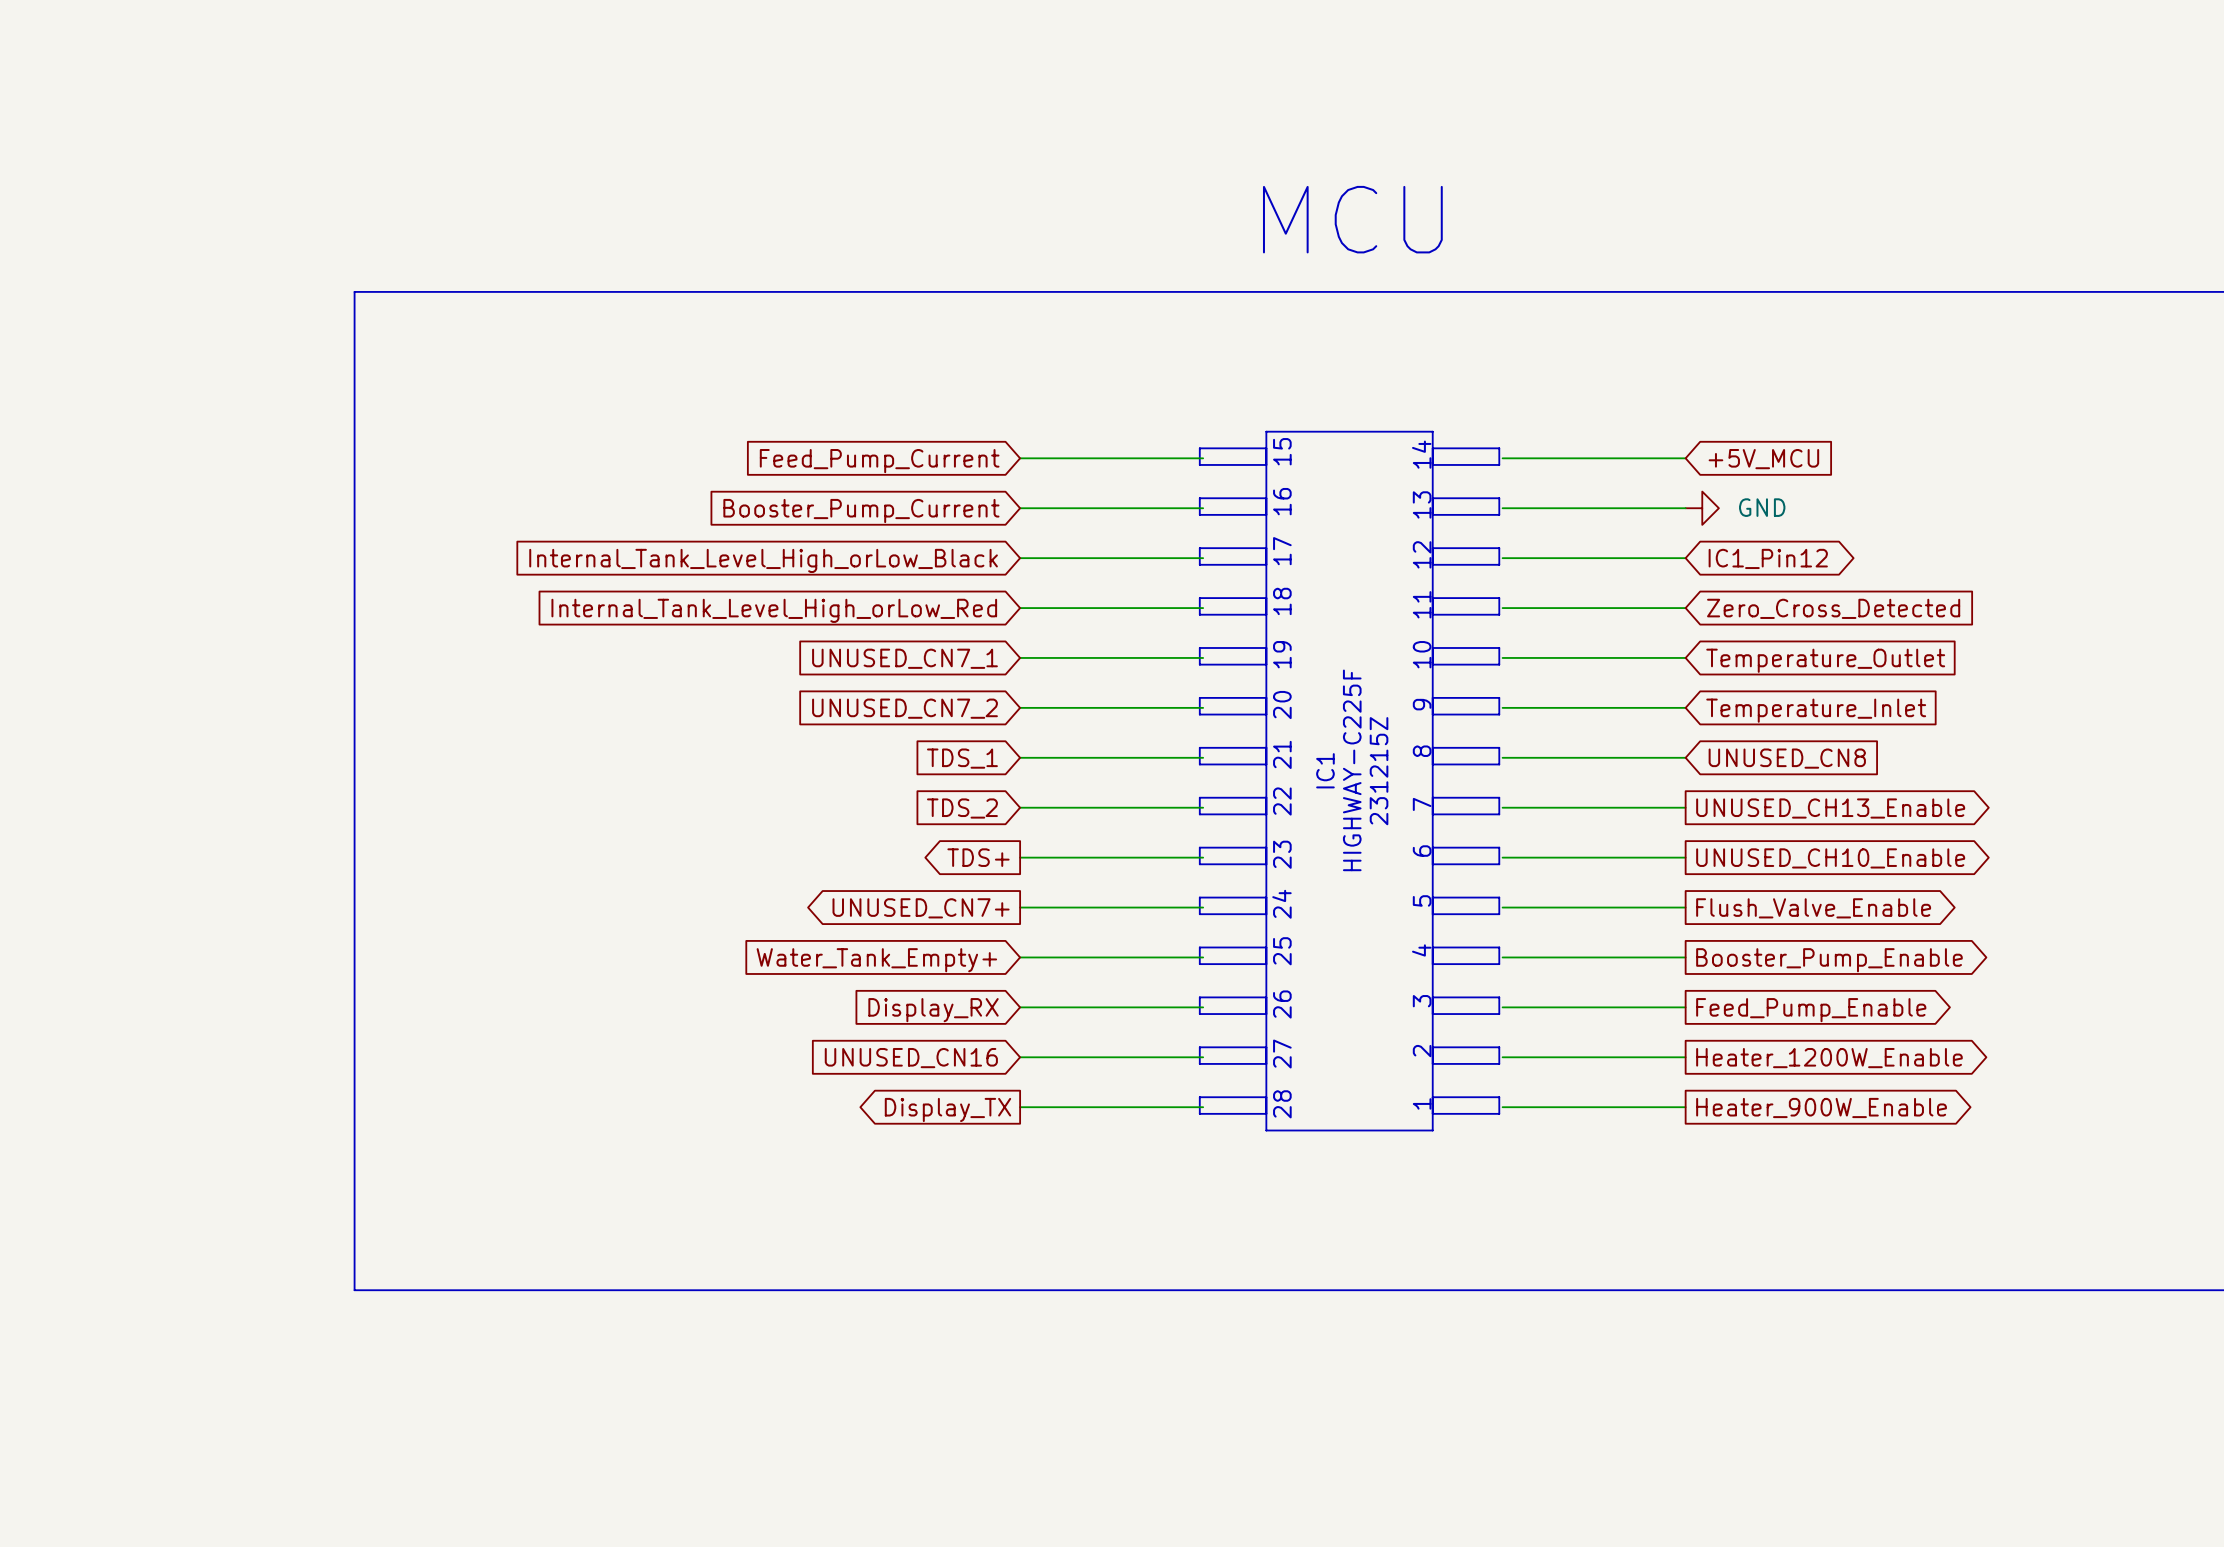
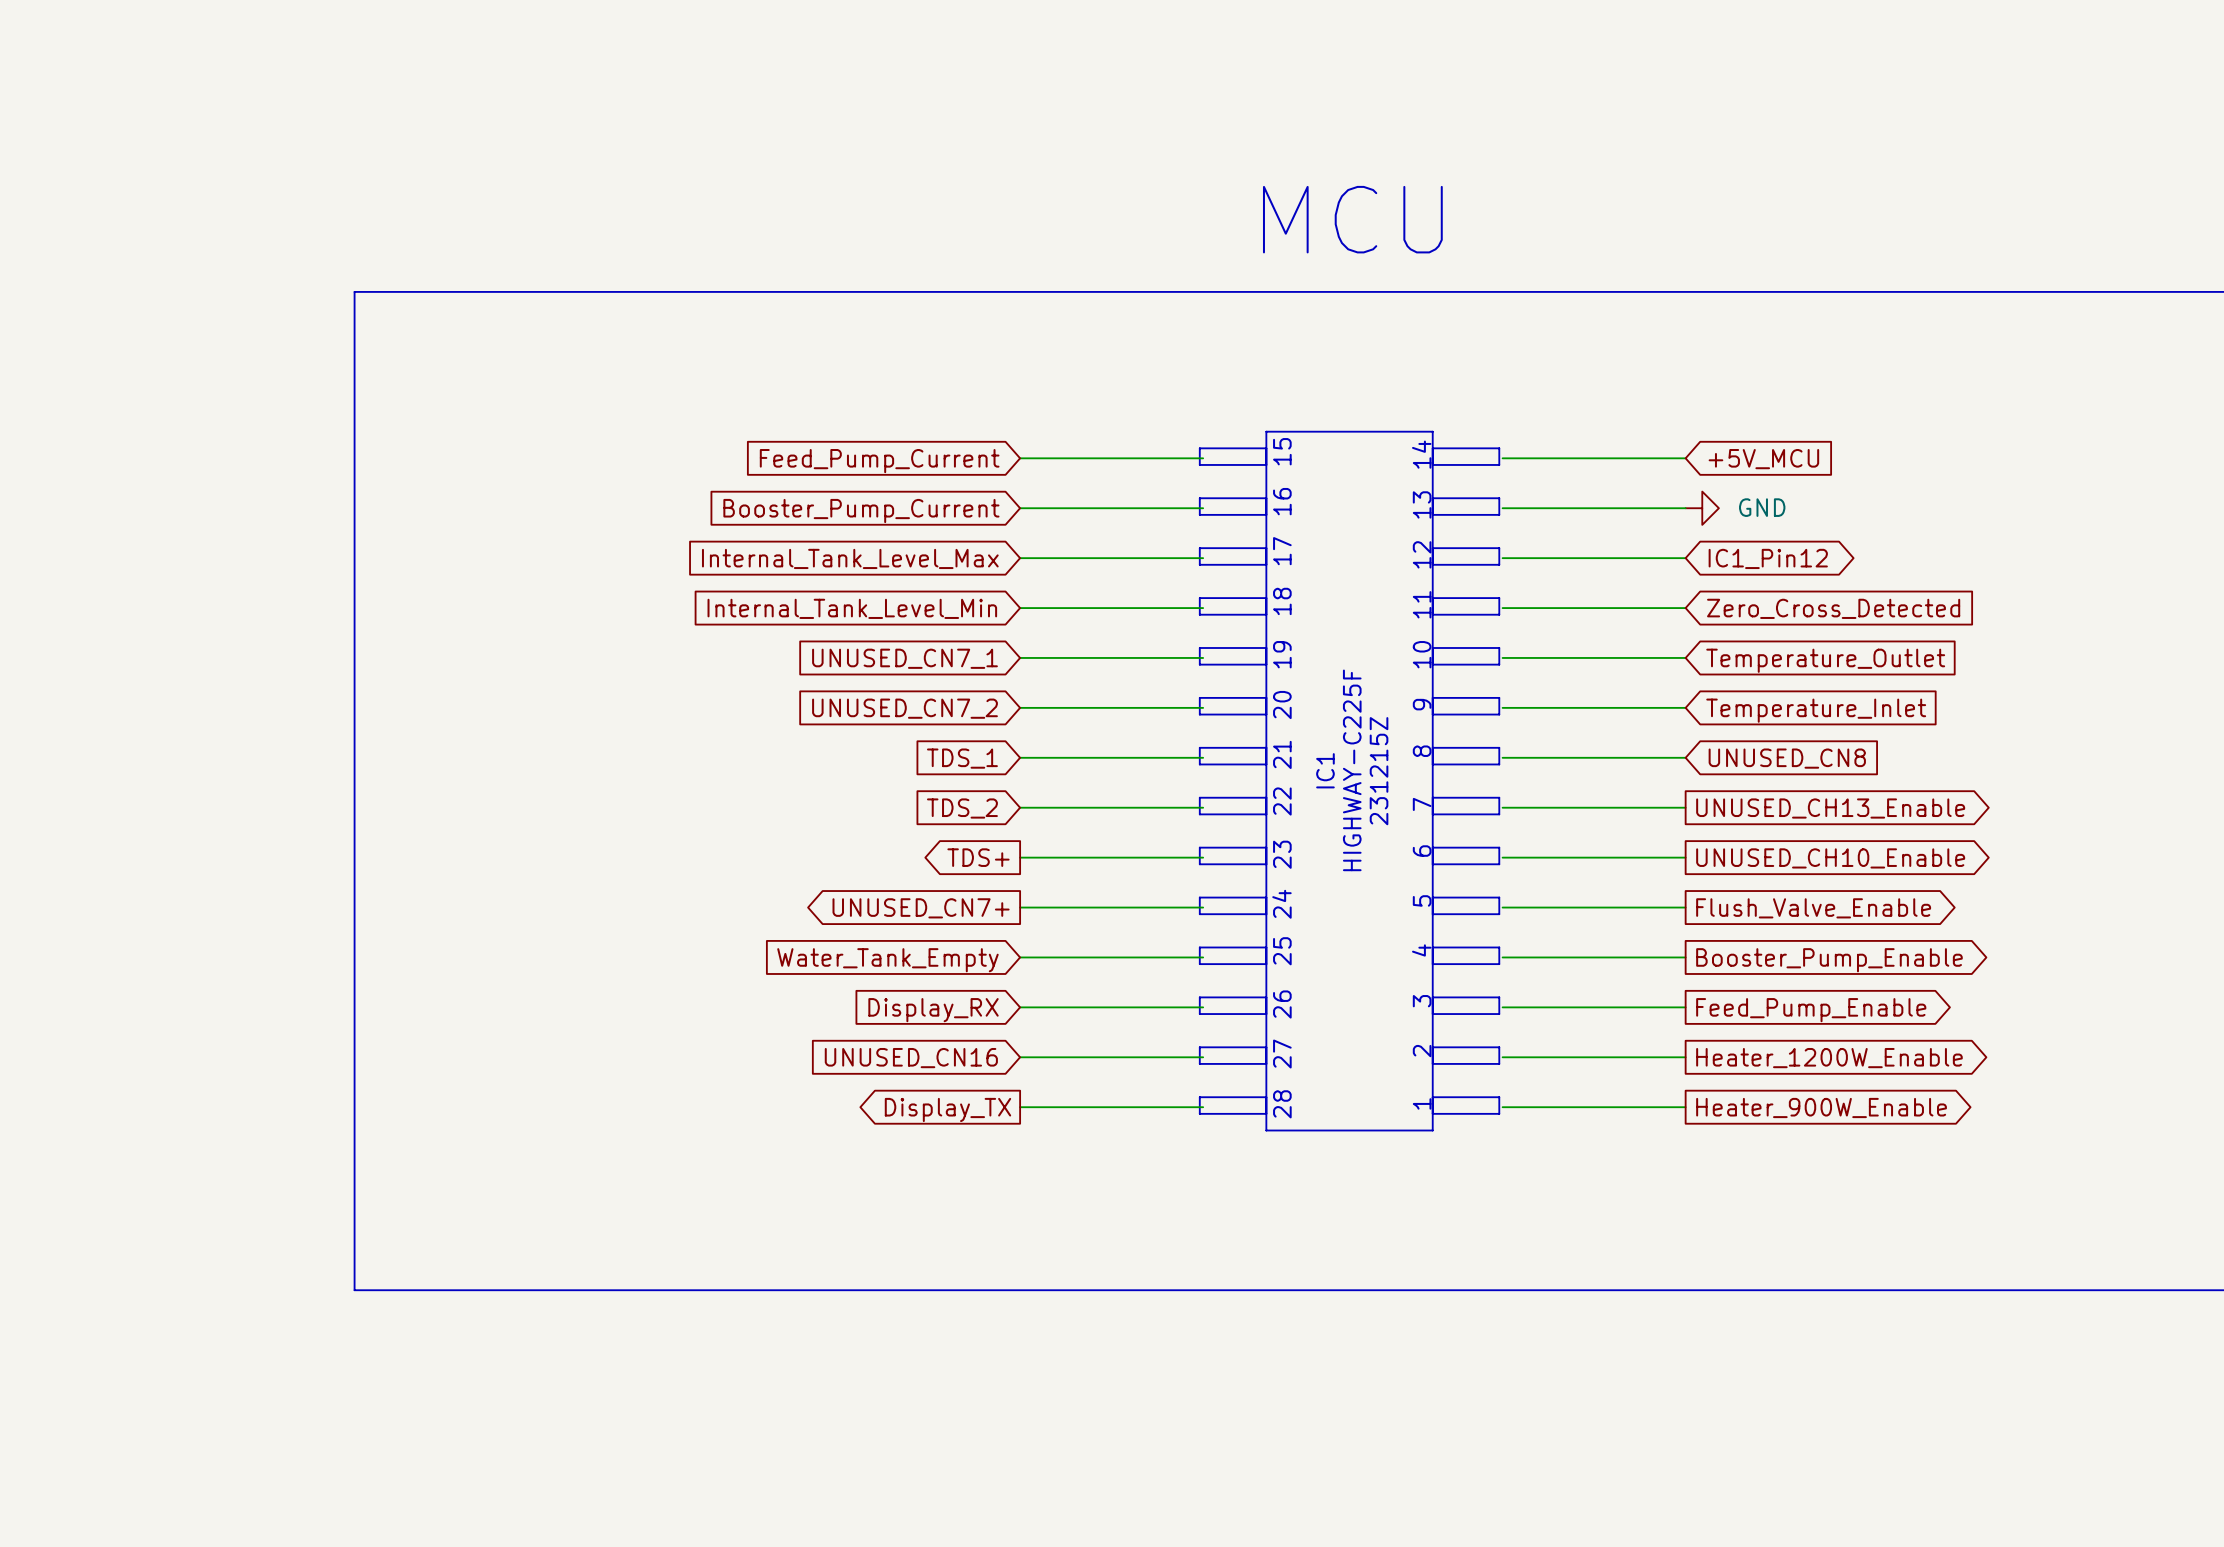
global label: Internal_Tank_Level_High_orLow_Black (763, 560) -> Internal_Tank_Level_Max (850, 558)
global label: Internal_Tank_Level_High_orLow_Red (774, 610) -> Internal_Tank_Level_Min (852, 608)
global label: Water_Tank_Empty+ (876, 960) -> Water_Tank_Empty (887, 960)

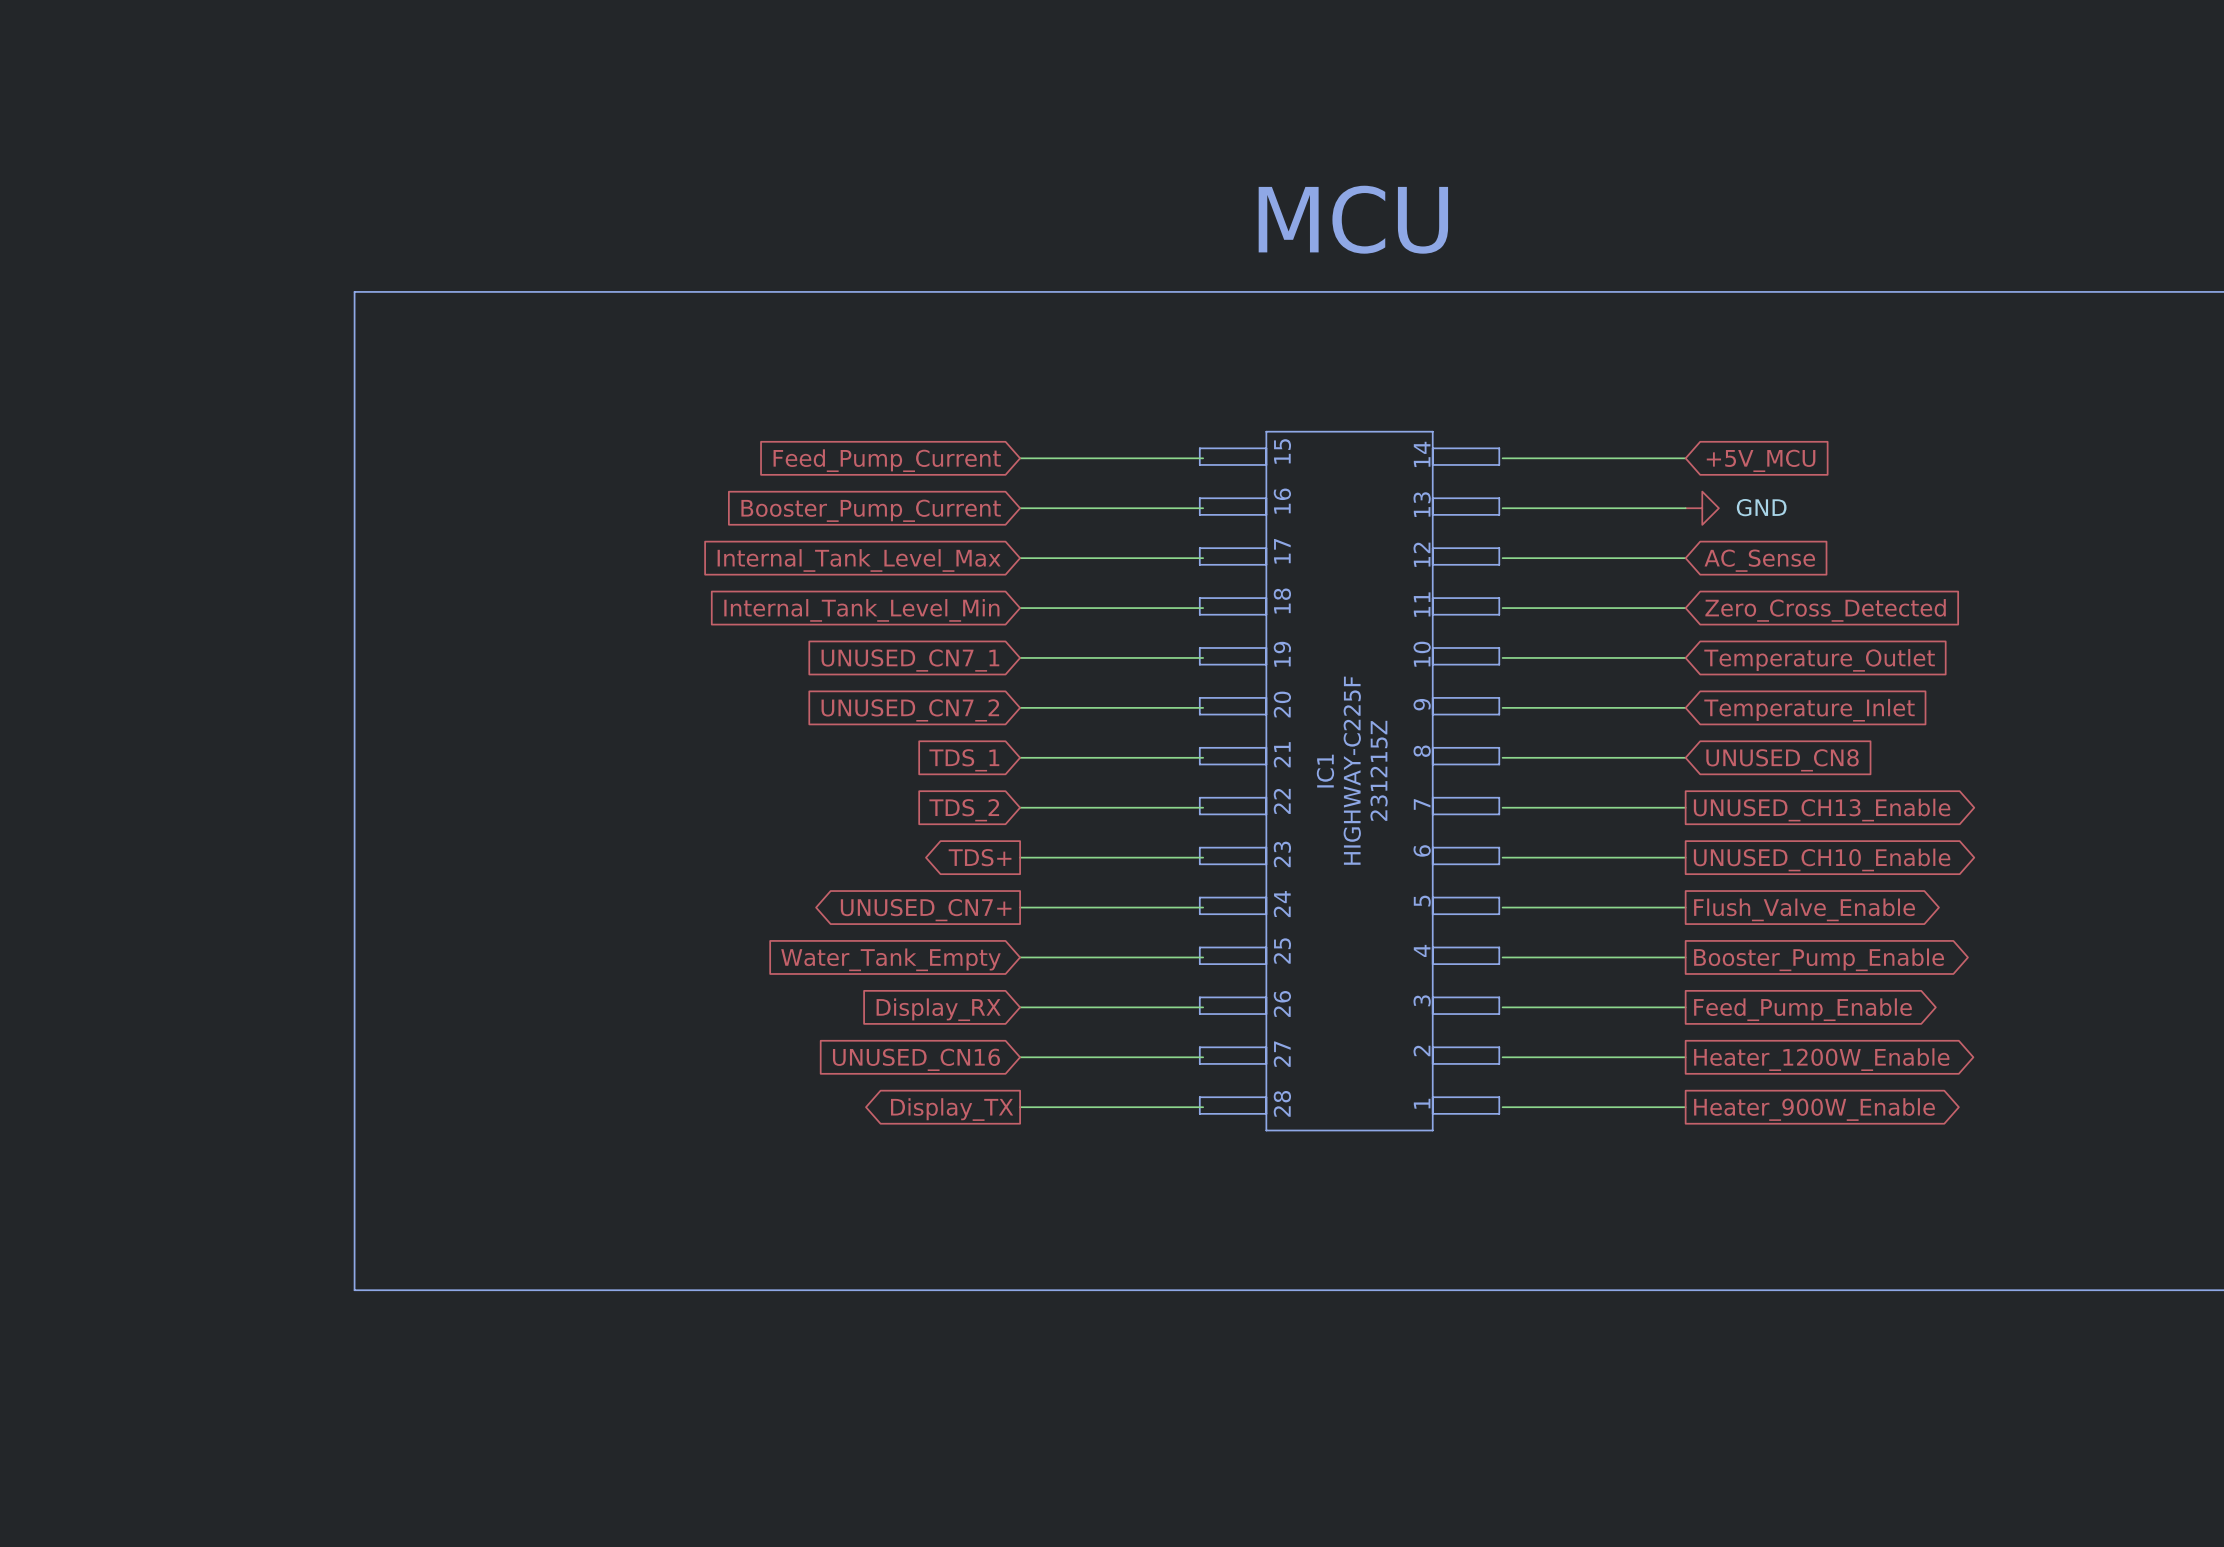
global label shape: bidirectional (1768, 558) -> input (1759, 560)
global label: IC1_Pin12 (1768, 558) -> AC_Sense (1759, 560)

